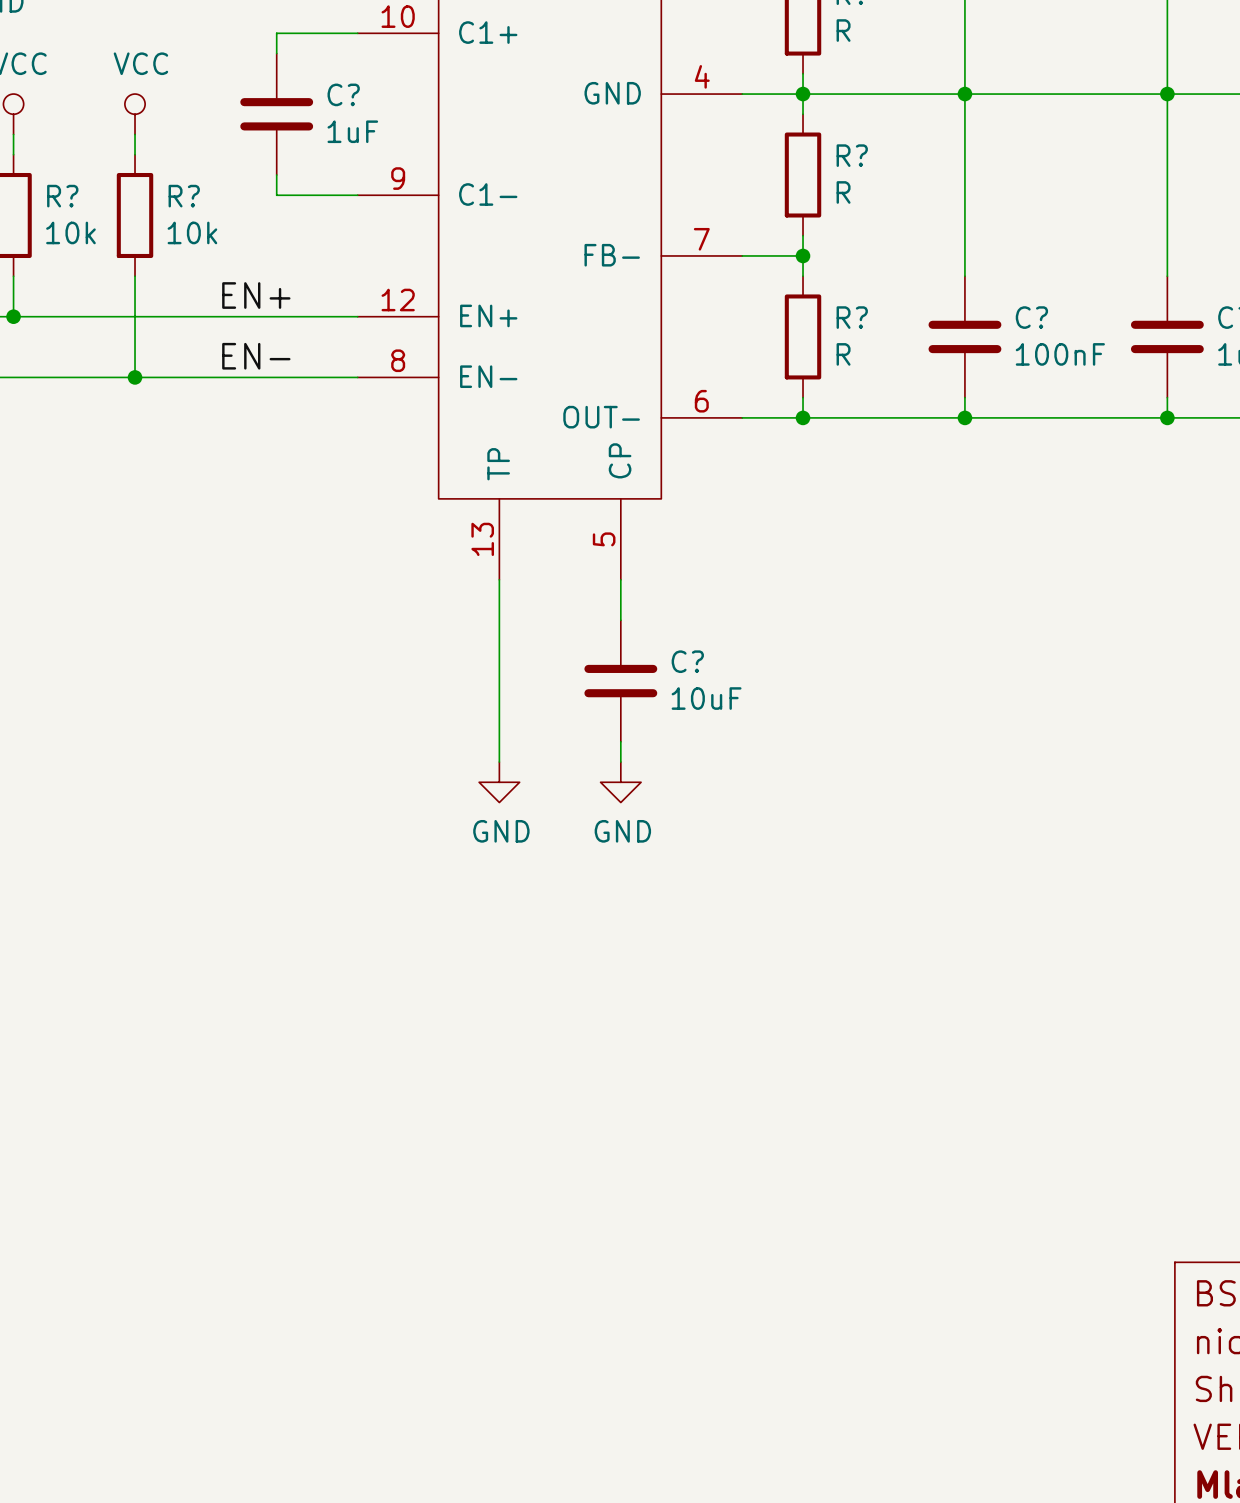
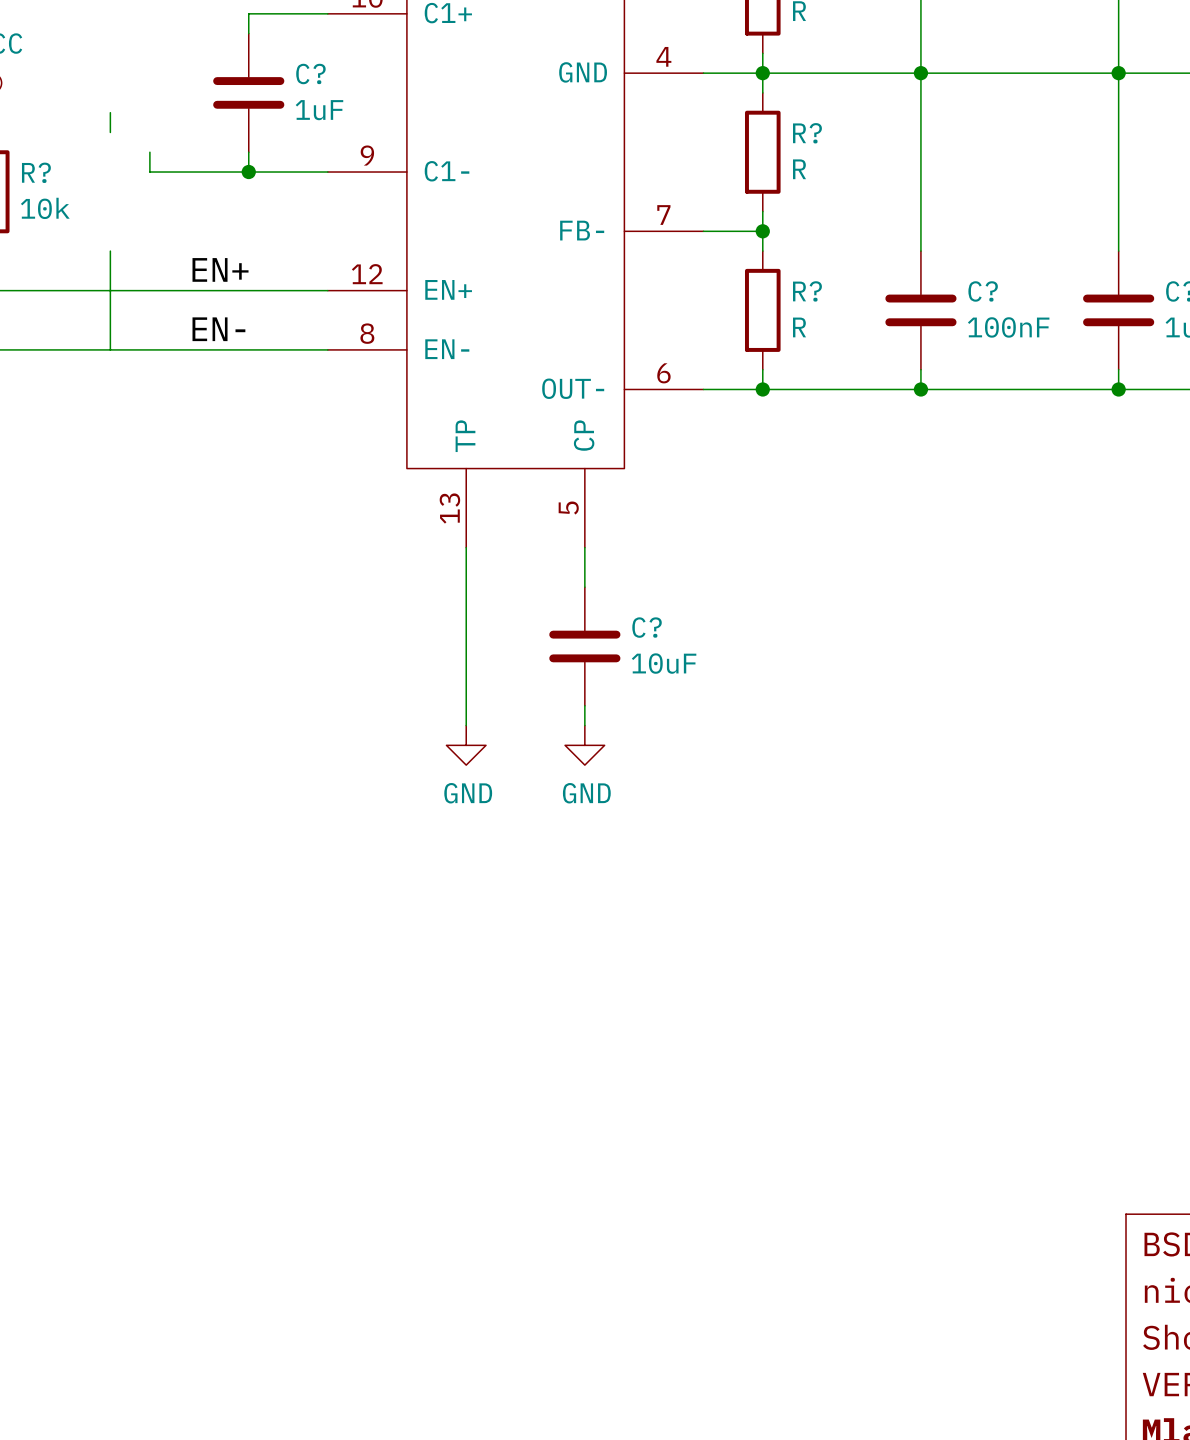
power symbol: VCC (135, 114) -> none
wire: none -> (149, 152) (149, 172) (248, 172)
junction: none -> (248, 172)
R?: 10k (135, 215) -> none
junction: (135, 377) -> none

